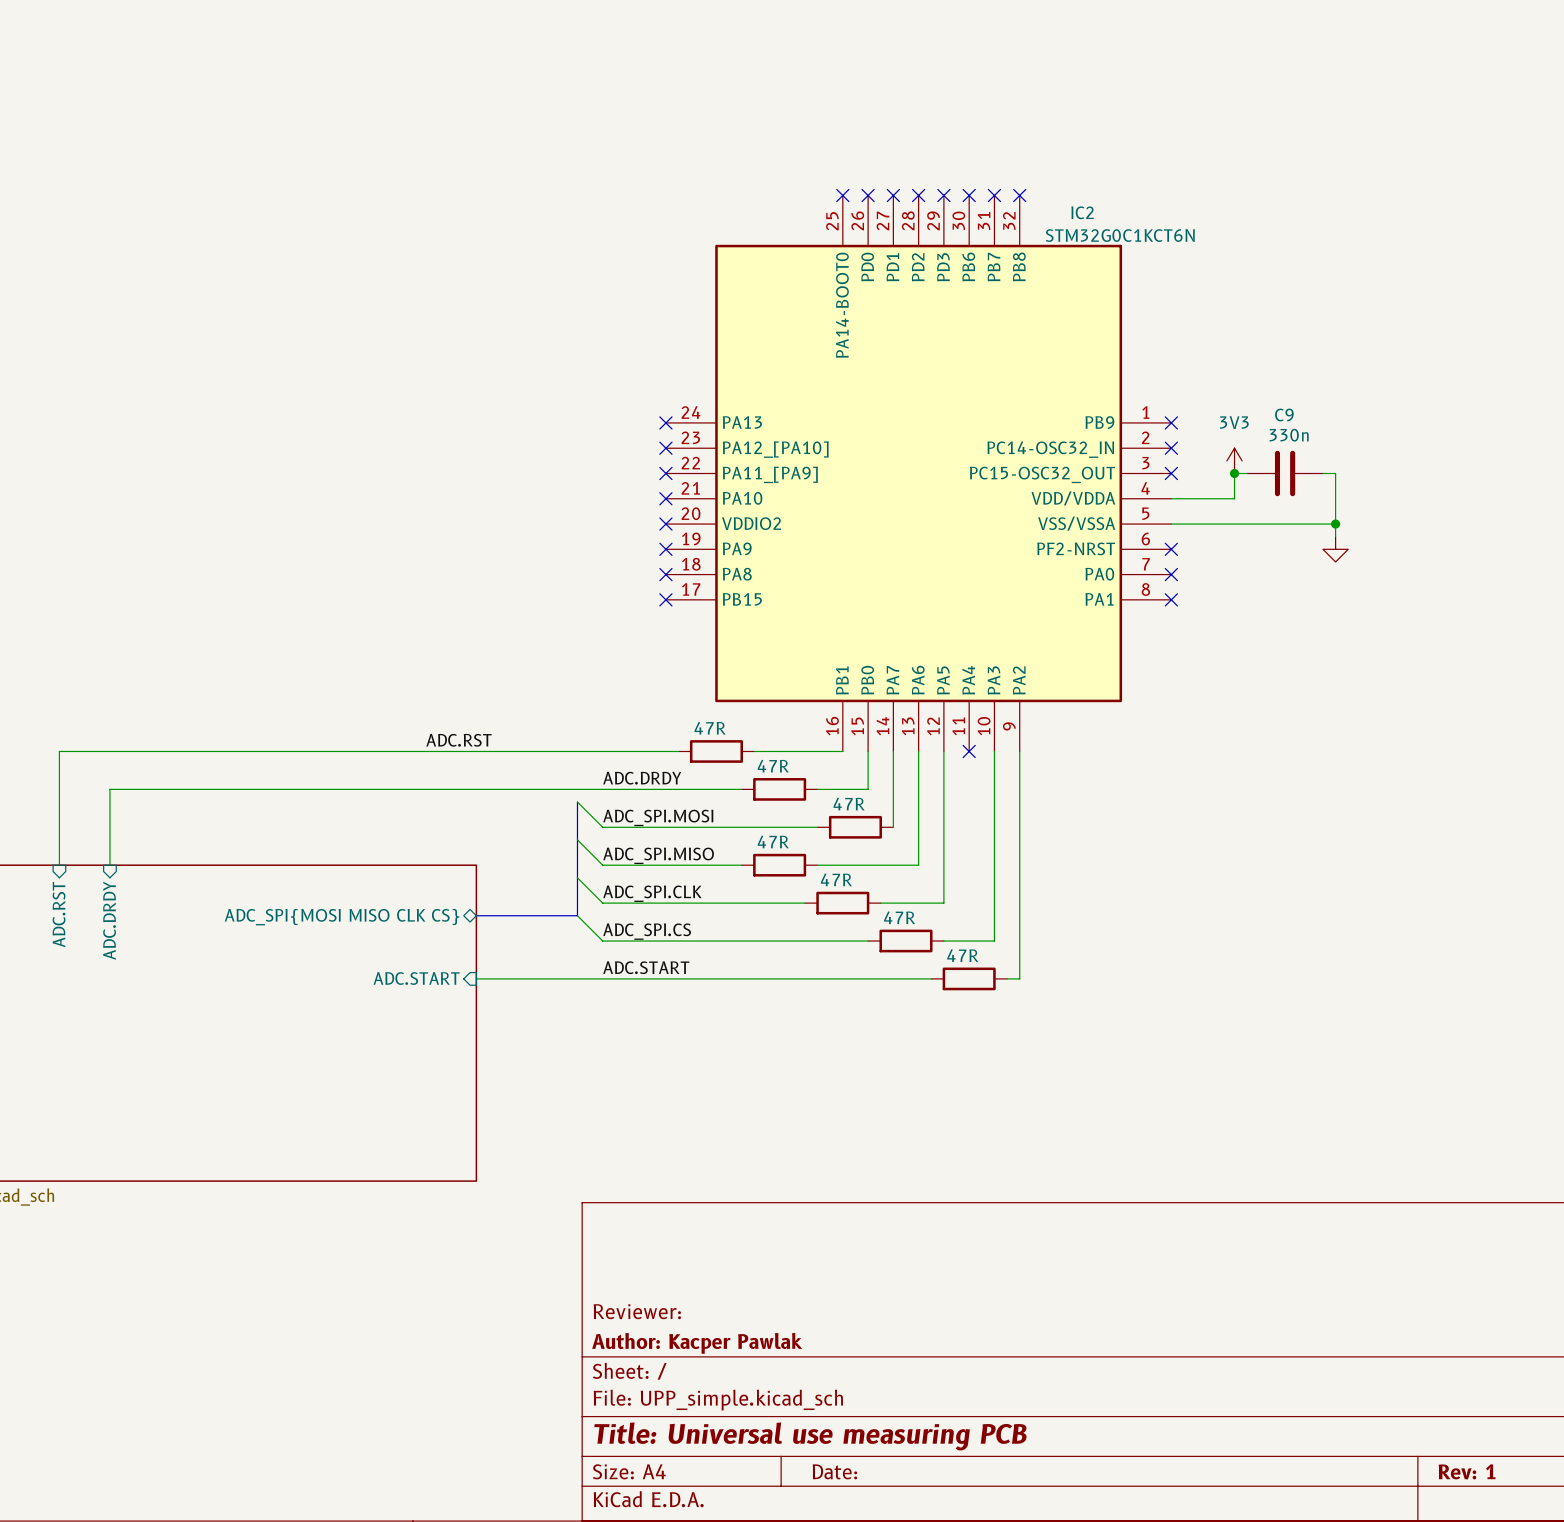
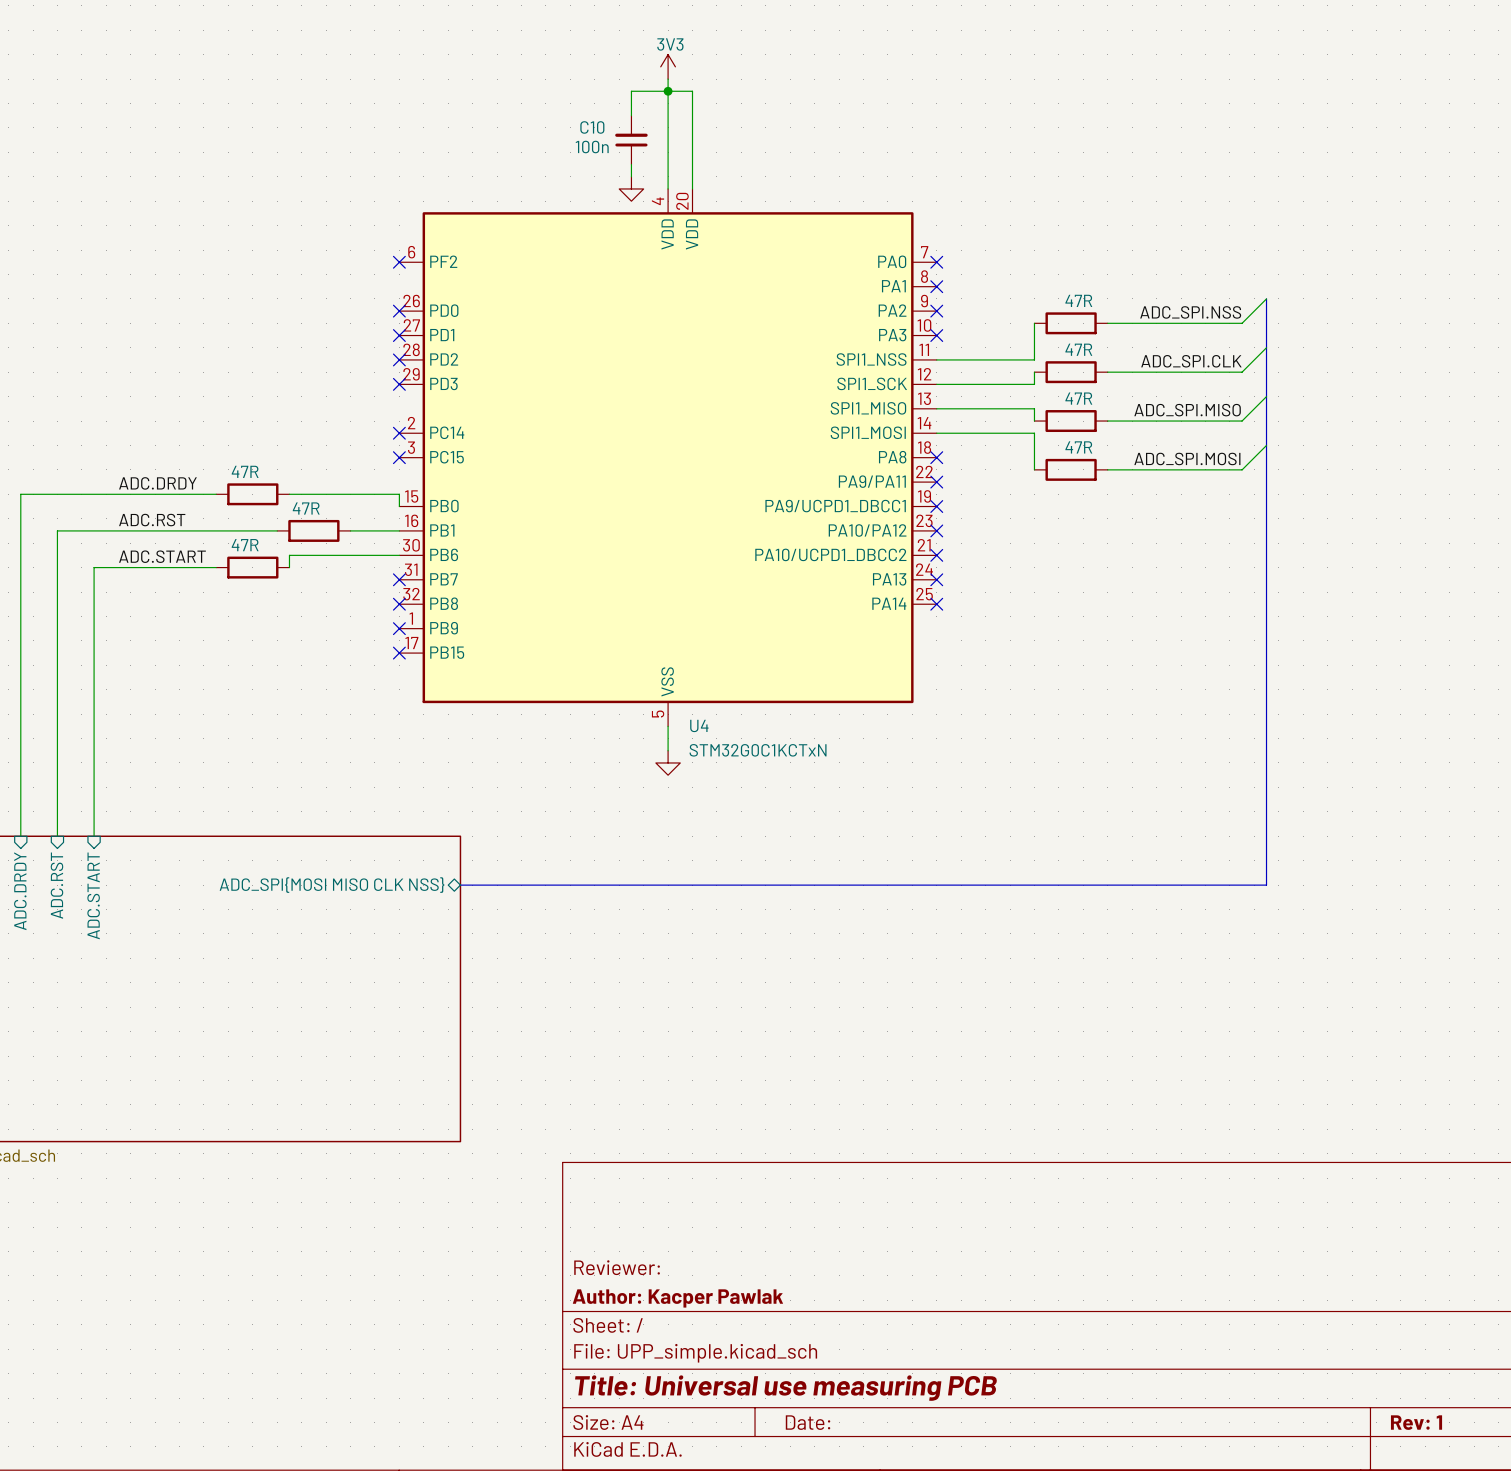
power symbol: none -> 3V3 (668, 66)
wire: none -> (668, 79) (668, 188)
junction: none -> (668, 91)
wire: none -> (631, 115) (631, 91) (692, 91) (692, 188)
C10: none -> 100n (631, 140)
wire: none -> (631, 164) (631, 176)
power symbol: none -> (631, 188)
no-connect mark: (842, 195) -> none
no-connect mark: (868, 195) -> none
no-connect mark: (893, 195) -> none
no-connect mark: (918, 195) -> none
no-connect mark: (943, 195) -> none
no-connect mark: (969, 195) -> none
no-connect mark: (994, 195) -> none
no-connect mark: (1019, 195) -> none
no-connect mark: none -> (399, 262)
no-connect mark: none -> (936, 262)
no-connect mark: none -> (936, 286)
wire: none -> (1266, 298) (1242, 323) (1107, 323)
no-connect mark: none -> (399, 311)
no-connect mark: none -> (936, 311)
label: none -> ADC_SPI.NSS (1190, 312)
part: none -> 47R (1071, 323)
no-connect mark: none -> (399, 335)
no-connect mark: none -> (936, 335)
wire: none -> (1266, 347) (1242, 372) (1107, 372)
no-connect mark: none -> (399, 359)
label: none -> ADC_SPI.CLK (1191, 361)
part: none -> 47R (1071, 372)
no-connect mark: none -> (399, 384)
wire: none -> (1266, 396) (1242, 421) (1107, 421)
no-connect mark: (665, 422) -> none
no-connect mark: (1171, 422) -> none
label: none -> ADC_SPI.MISO (1187, 410)
part: none -> 47R (1071, 421)
no-connect mark: none -> (399, 433)
no-connect mark: (665, 448) -> none
no-connect mark: (1171, 448) -> none
power symbol: 3V3 (1234, 460) -> none
wire: none -> (1266, 445) (1242, 469) (1107, 469)
no-connect mark: none -> (399, 457)
no-connect mark: (665, 473) -> none
U4: none -> STM32G0C1KCTxN (668, 457)
IC2: STM32G0C1KCT6N (918, 473) -> none
no-connect mark: none -> (936, 457)
no-connect mark: (1171, 473) -> none
junction: (1234, 473) -> none
wire: (1247, 473) (1234, 473) (1234, 498) (1171, 498) -> none
C9: 330n (1285, 473) -> none
wire: (1322, 473) (1335, 473) (1335, 536) -> none
label: none -> ADC_SPI.MOSI (1187, 458)
part: none -> 47R (1071, 469)
no-connect mark: (665, 498) -> none
no-connect mark: none -> (936, 482)
label: none -> ADC.DRDY (157, 483)
wire: none -> (216, 494) (20, 494) (20, 836)
part: none -> 47R (252, 494)
wire: none -> (289, 494) (399, 494) (399, 506)
no-connect mark: (665, 524) -> none
no-connect mark: none -> (936, 506)
wire: (1171, 524) (1335, 524) -> none
junction: (1335, 524) -> none
label: none -> ADC.RST (152, 520)
part: none -> 47R (313, 530)
wire: none -> (350, 530) (399, 530)
no-connect mark: (665, 549) -> none
no-connect mark: none -> (936, 530)
no-connect mark: (1171, 549) -> none
power symbol: (1335, 549) -> none
wire: none -> (399, 555) (289, 555) (289, 567)
no-connect mark: (665, 574) -> none
no-connect mark: none -> (936, 555)
no-connect mark: (1171, 574) -> none
label: none -> ADC.START (162, 556)
wire: none -> (216, 567) (94, 567) (94, 836)
part: none -> 47R (252, 567)
no-connect mark: none -> (399, 579)
no-connect mark: (665, 599) -> none
no-connect mark: none -> (936, 579)
no-connect mark: (1171, 599) -> none
no-connect mark: none -> (399, 604)
no-connect mark: none -> (936, 604)
no-connect mark: none -> (399, 628)
no-connect mark: none -> (399, 653)
label: ADC.RST (459, 740) -> none
wire: (59, 751) (678, 751) -> (57, 726) (57, 530) (277, 530)
wire: none -> (668, 726) (668, 750)
part: 47R (716, 751) -> none
wire: (754, 751) (842, 751) -> none
wire: (868, 751) (868, 789) (817, 789) -> none
wire: (893, 751) (893, 827) -> none
wire: (918, 751) (918, 865) (817, 865) -> none
wire: (943, 751) (943, 903) (880, 903) -> none
no-connect mark: (969, 751) -> none
wire: (994, 751) (994, 941) (943, 941) -> none
wire: (1019, 751) (1019, 978) (1007, 978) -> none
label: ADC.DRDY (642, 778) -> none
power symbol: none -> (668, 762)
wire: (741, 789) (109, 789) (109, 865) -> none
part: 47R (779, 789) -> none
wire: (577, 802) (602, 827) (817, 827) -> none
bus: (577, 802) (577, 915) -> (1266, 298) (1266, 885) (558, 885)
label: ADC_SPI.MOSI (658, 817) -> none
part: 47R (855, 827) -> none
wire: (577, 839) (602, 865) (741, 865) -> none
label: ADC_SPI.MISO (658, 855) -> none
part: 47R (779, 865) -> none
wire: (577, 877) (602, 903) (804, 903) -> none
label: ADC_SPI.CLK (652, 893) -> none
part: 47R (842, 903) -> none
wire: (577, 915) (602, 941) (868, 941) -> none
sheet pin: ADC_SPI{MOSI MISO CLK CS} (342, 917) -> ADC_SPI{MOSI MISO CLK NSS} (332, 885)
sheet pin position: ADC.DRDY (109, 920) -> ADC.DRDY (20, 891)
sheet pin: none -> ADC.START (93, 895)
label: ADC_SPI.CS (647, 931) -> none
part: 47R (905, 941) -> none
label: ADC.START (646, 967) -> none
sheet pin: ADC.START (416, 978) -> none
wire: (476, 978) (931, 978) -> none
part: 47R (969, 978) -> none

